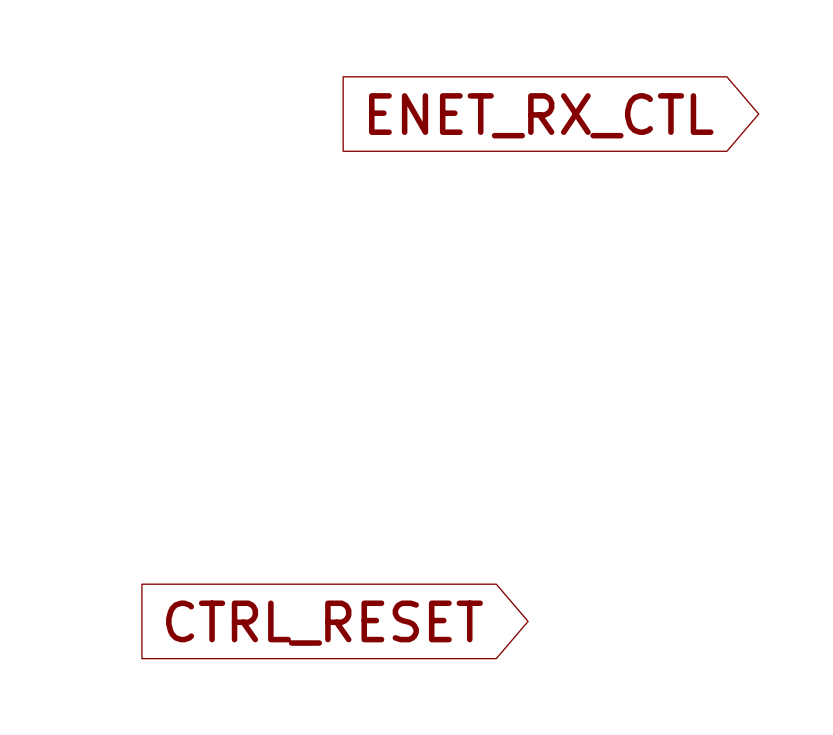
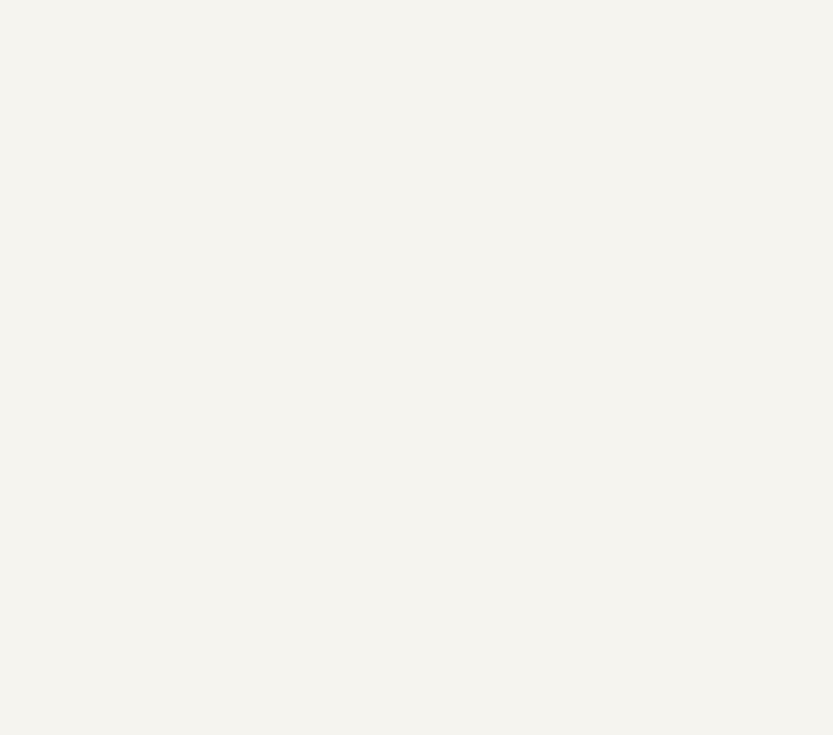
global label: ENET_RX_CTL (541, 115) -> none
global label: CTRL_RESET (324, 623) -> none

